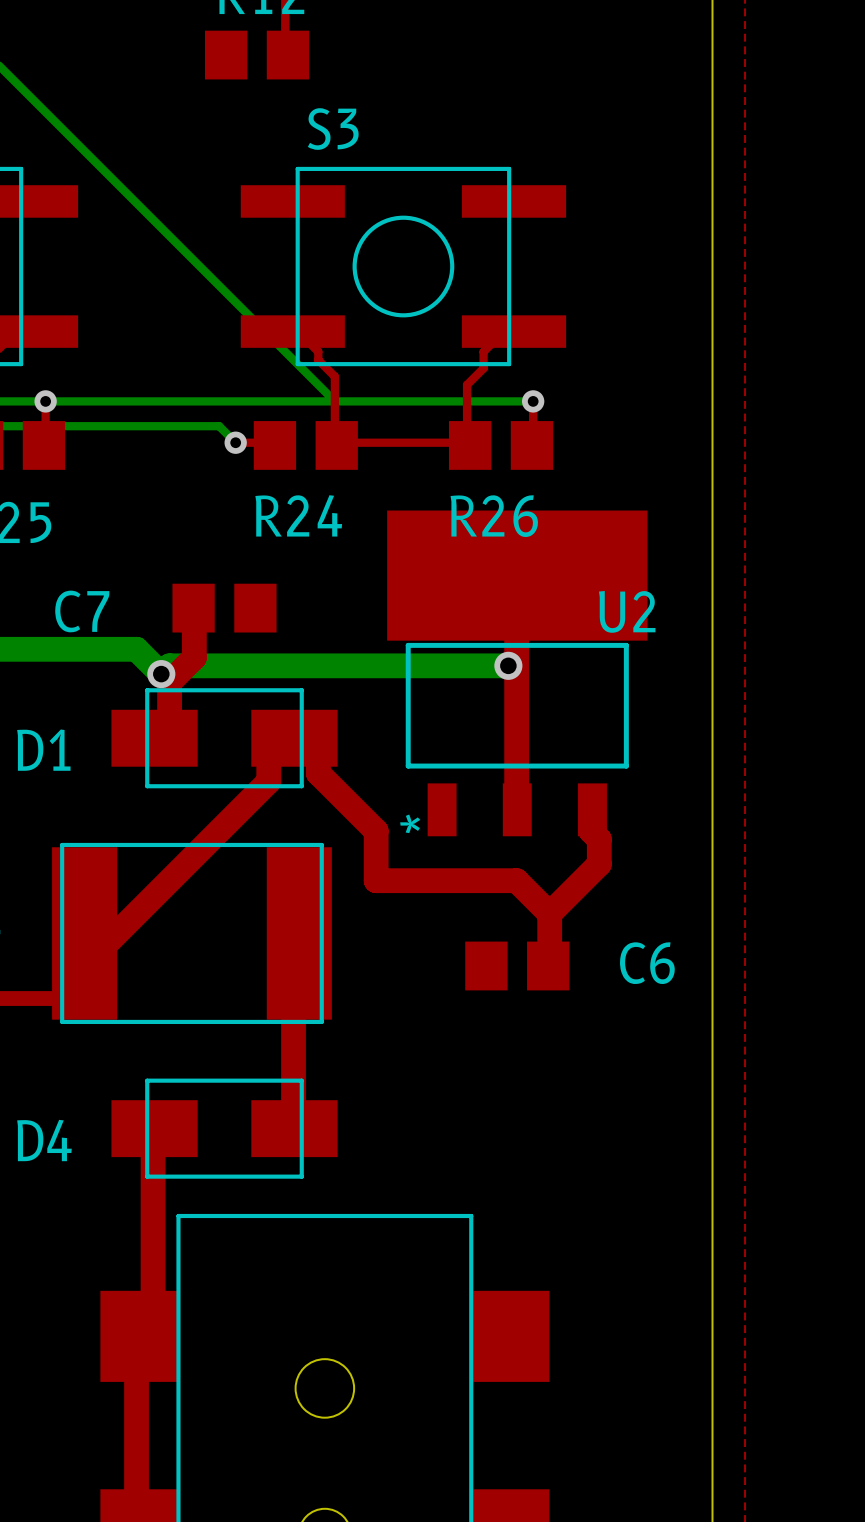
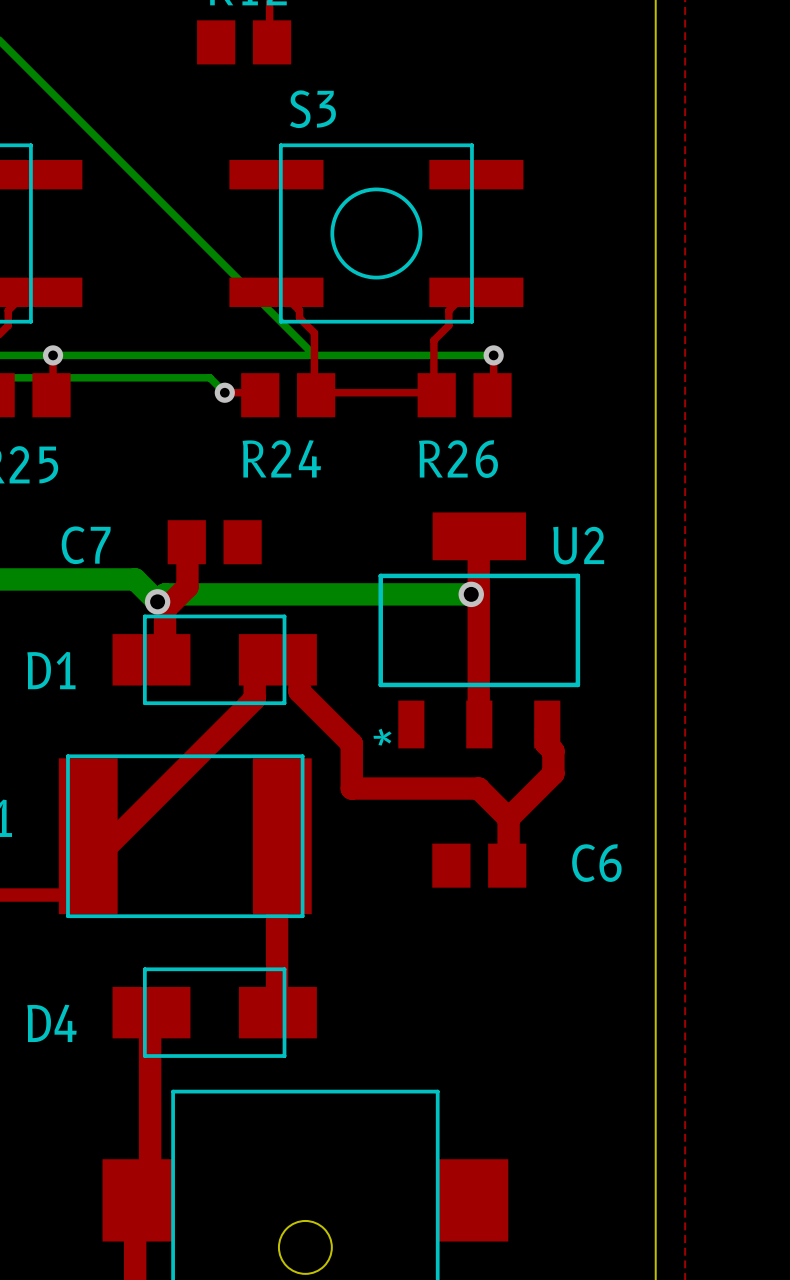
drawing: [387, 510, 648, 641] -> none

